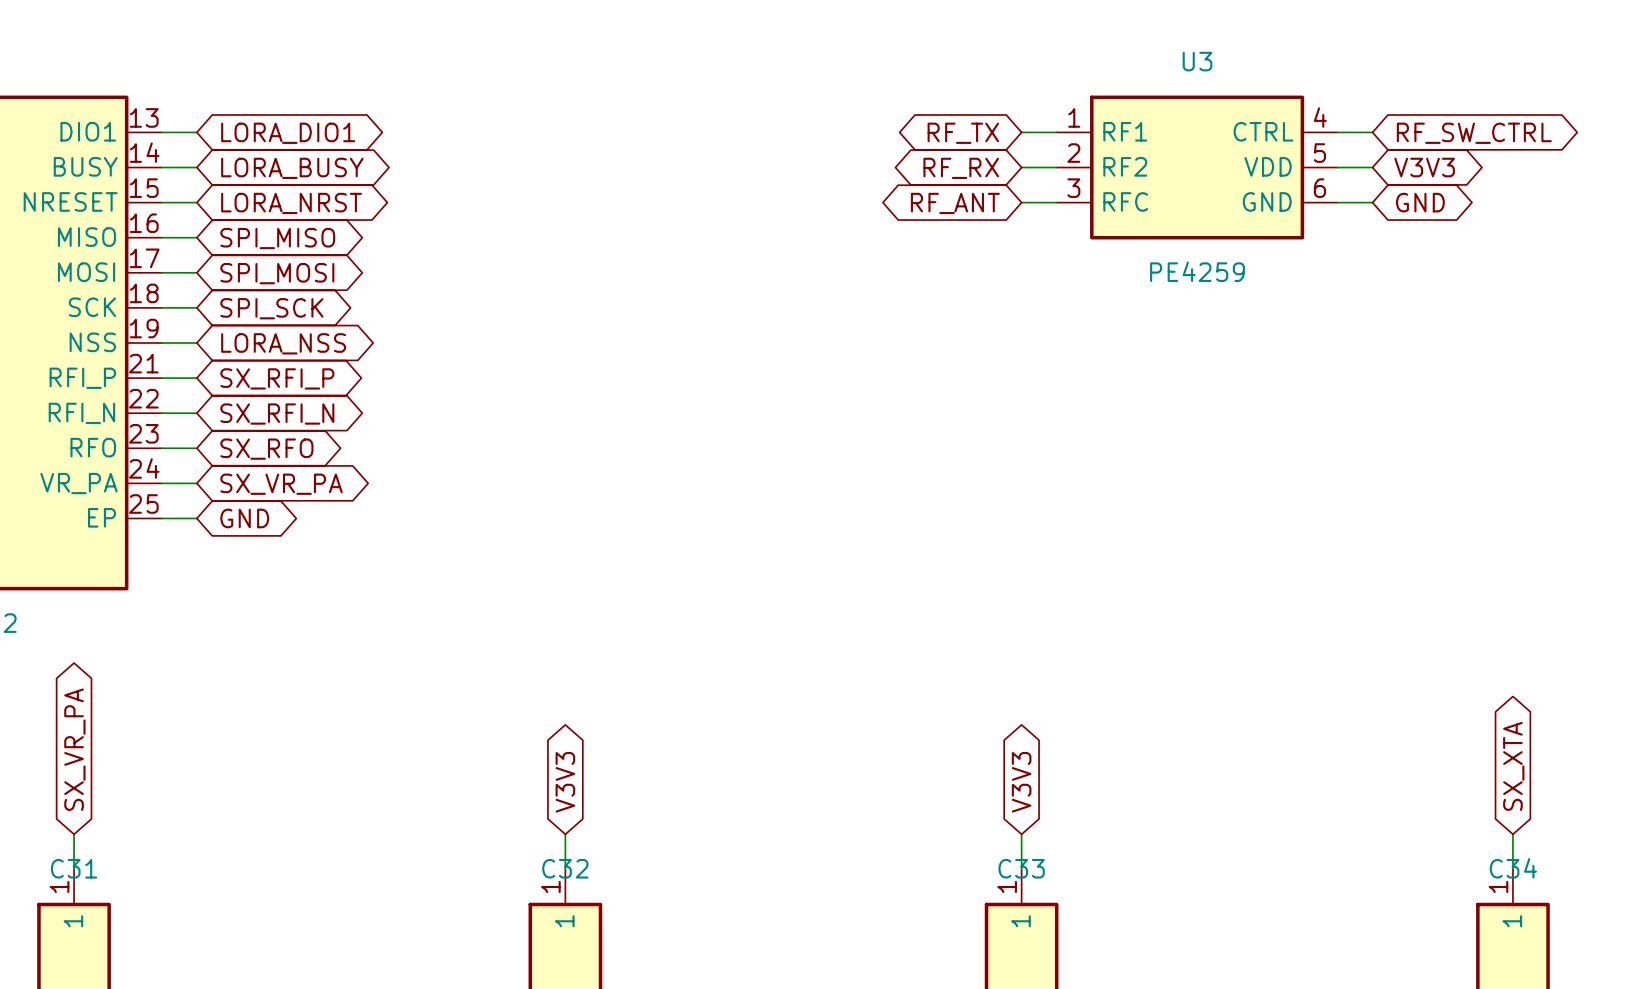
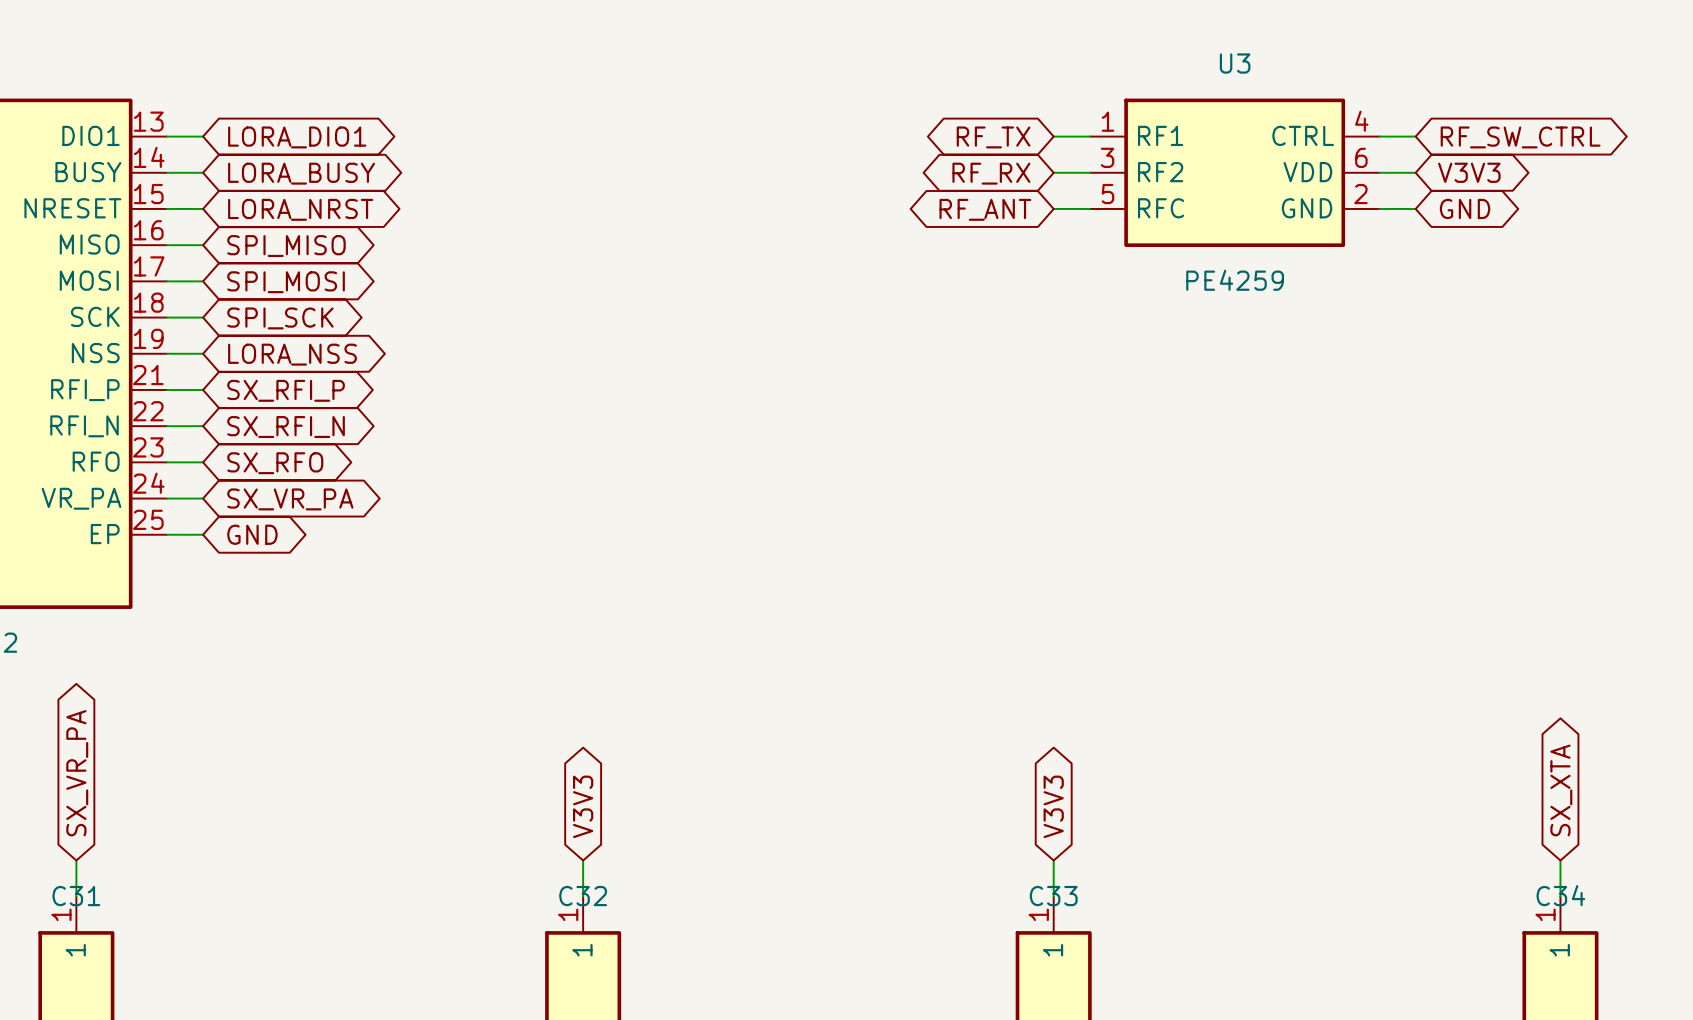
U3 pin number: 2 (1073, 153) -> 3 (1107, 157)
U3 pin number: 5 (1319, 153) -> 6 (1361, 157)
U3 pin number: 3 (1073, 188) -> 5 (1107, 194)
U3 pin number: 6 (1319, 188) -> 2 (1360, 194)

